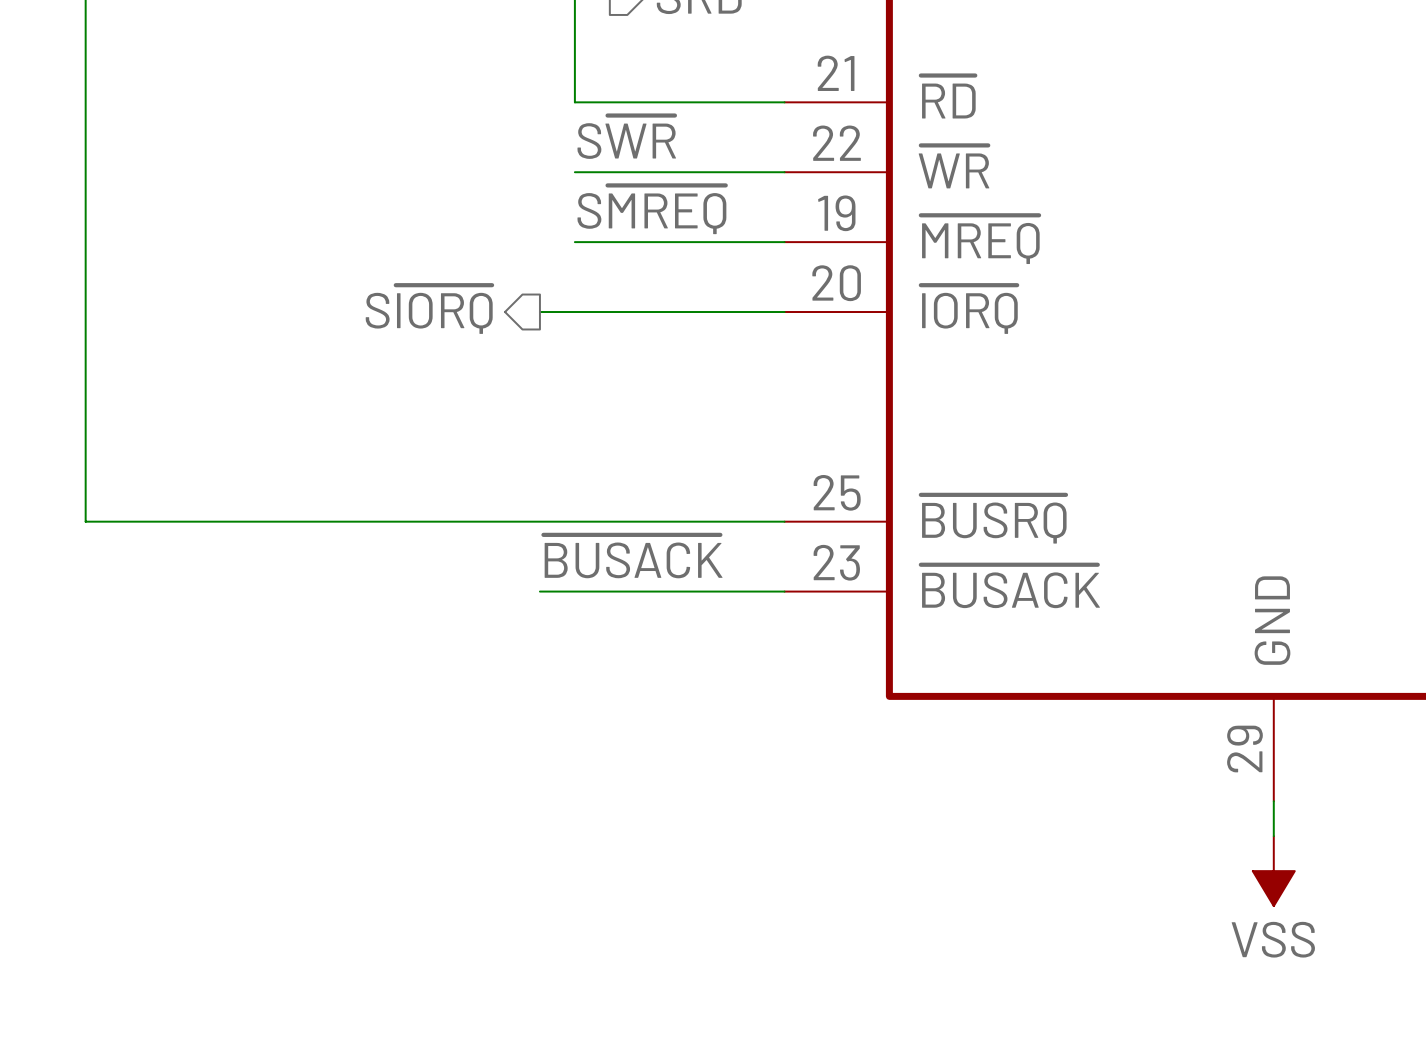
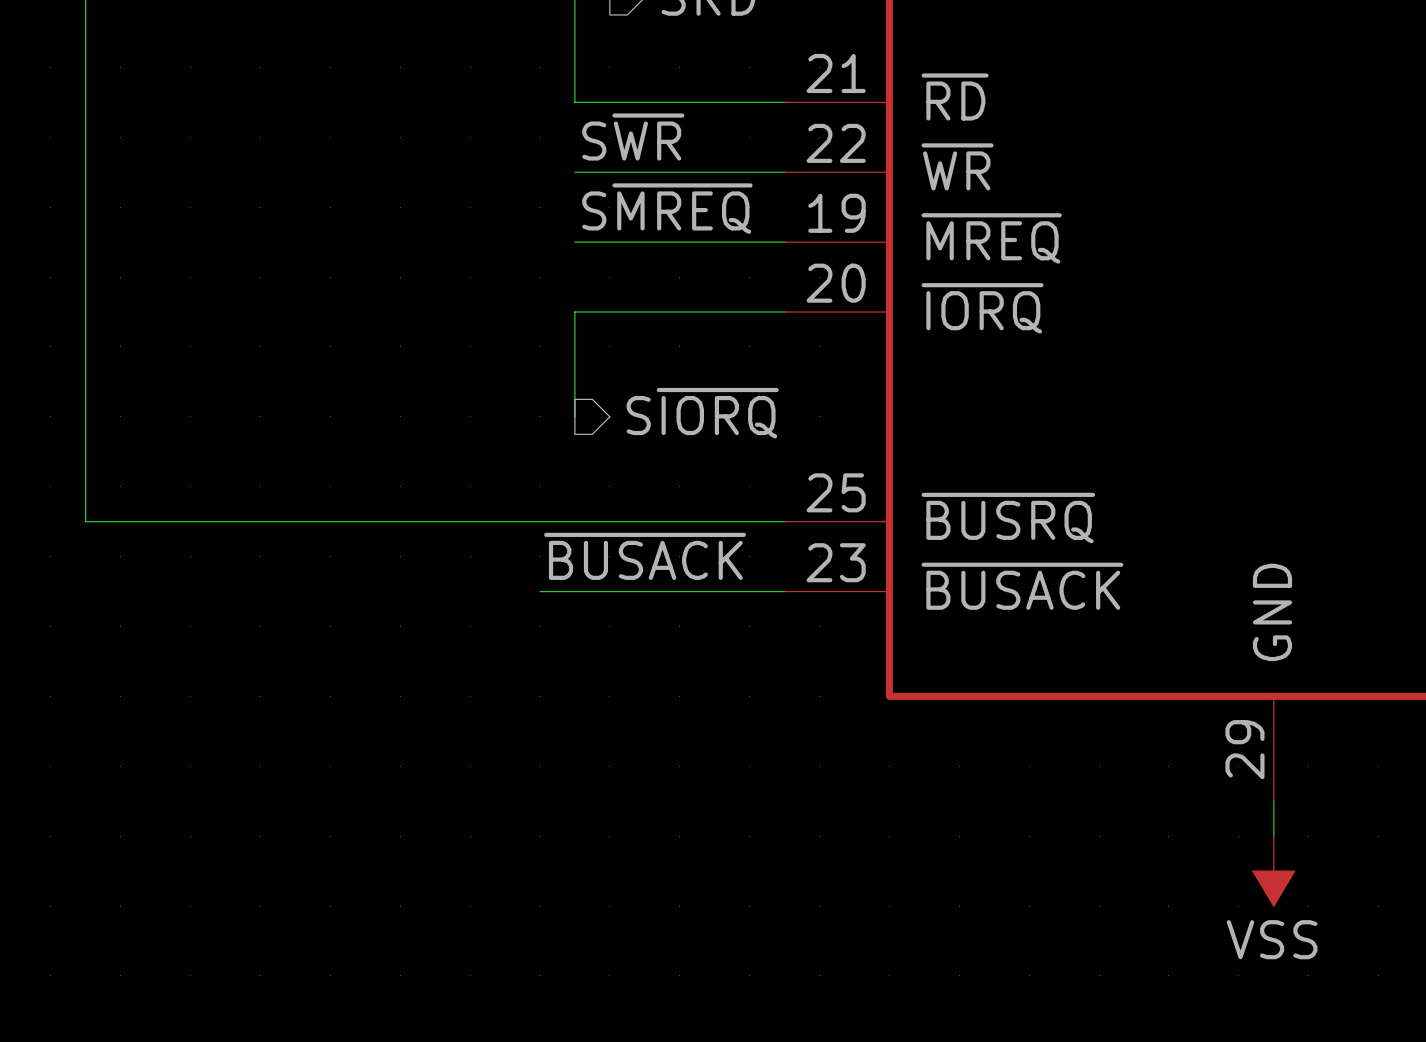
hierarchical label rotation: 0° (429, 309) -> 180° (702, 413)
hierarchical label position: S~{IORQ} (429, 309) -> S~{IORQ} (702, 413)
wire: (539, 312) (574, 312) -> (574, 416) (574, 312)

